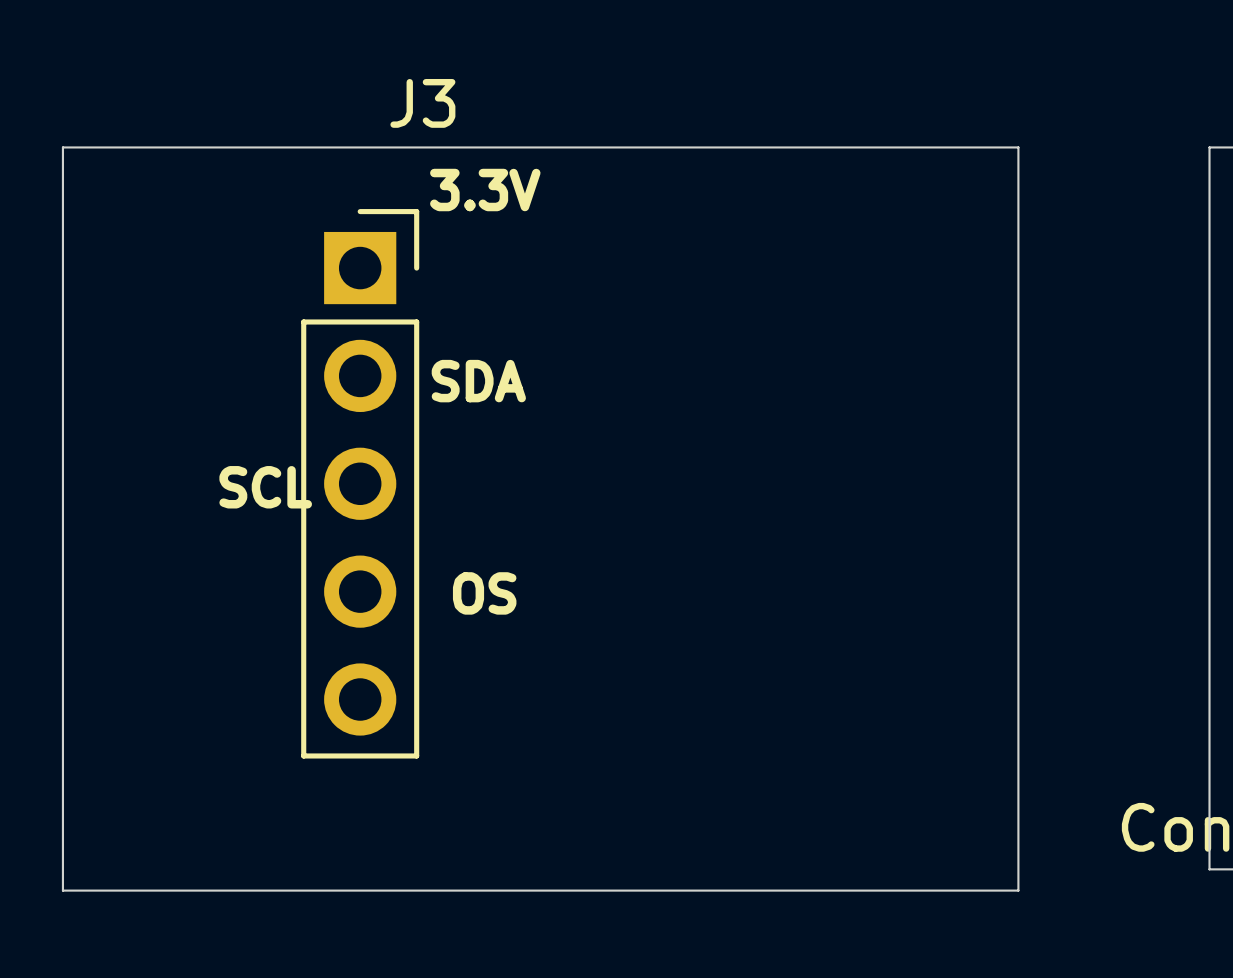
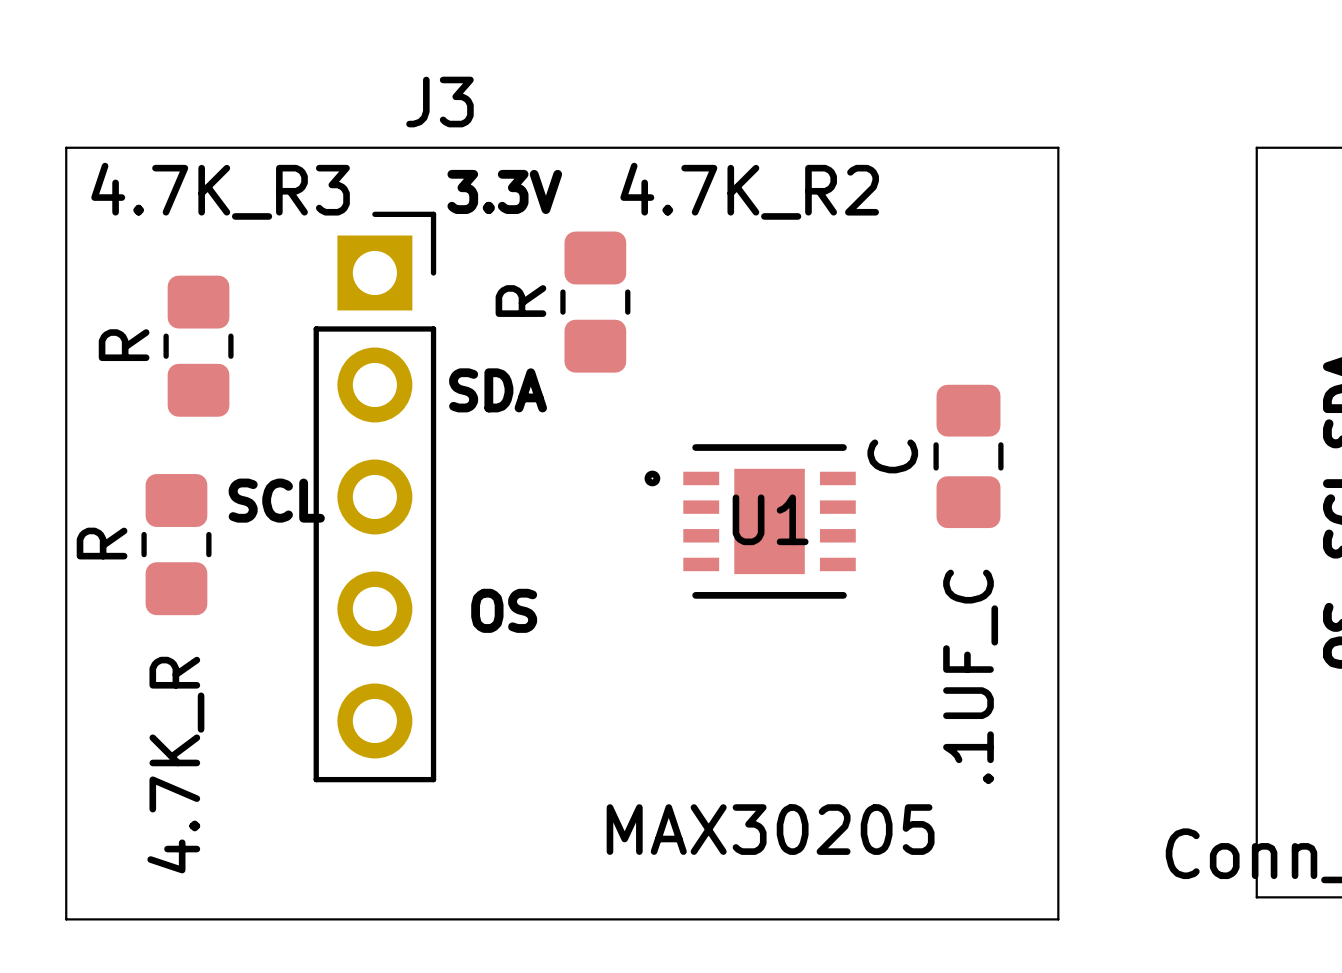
4.7K_R2: none -> R (595, 302)
4.7K_R3: none -> R (198, 346)
.1UF_C: none -> C (968, 456)
U1: none -> MAX30205 (750, 521)
4.7K_R: none -> R (176, 544)

